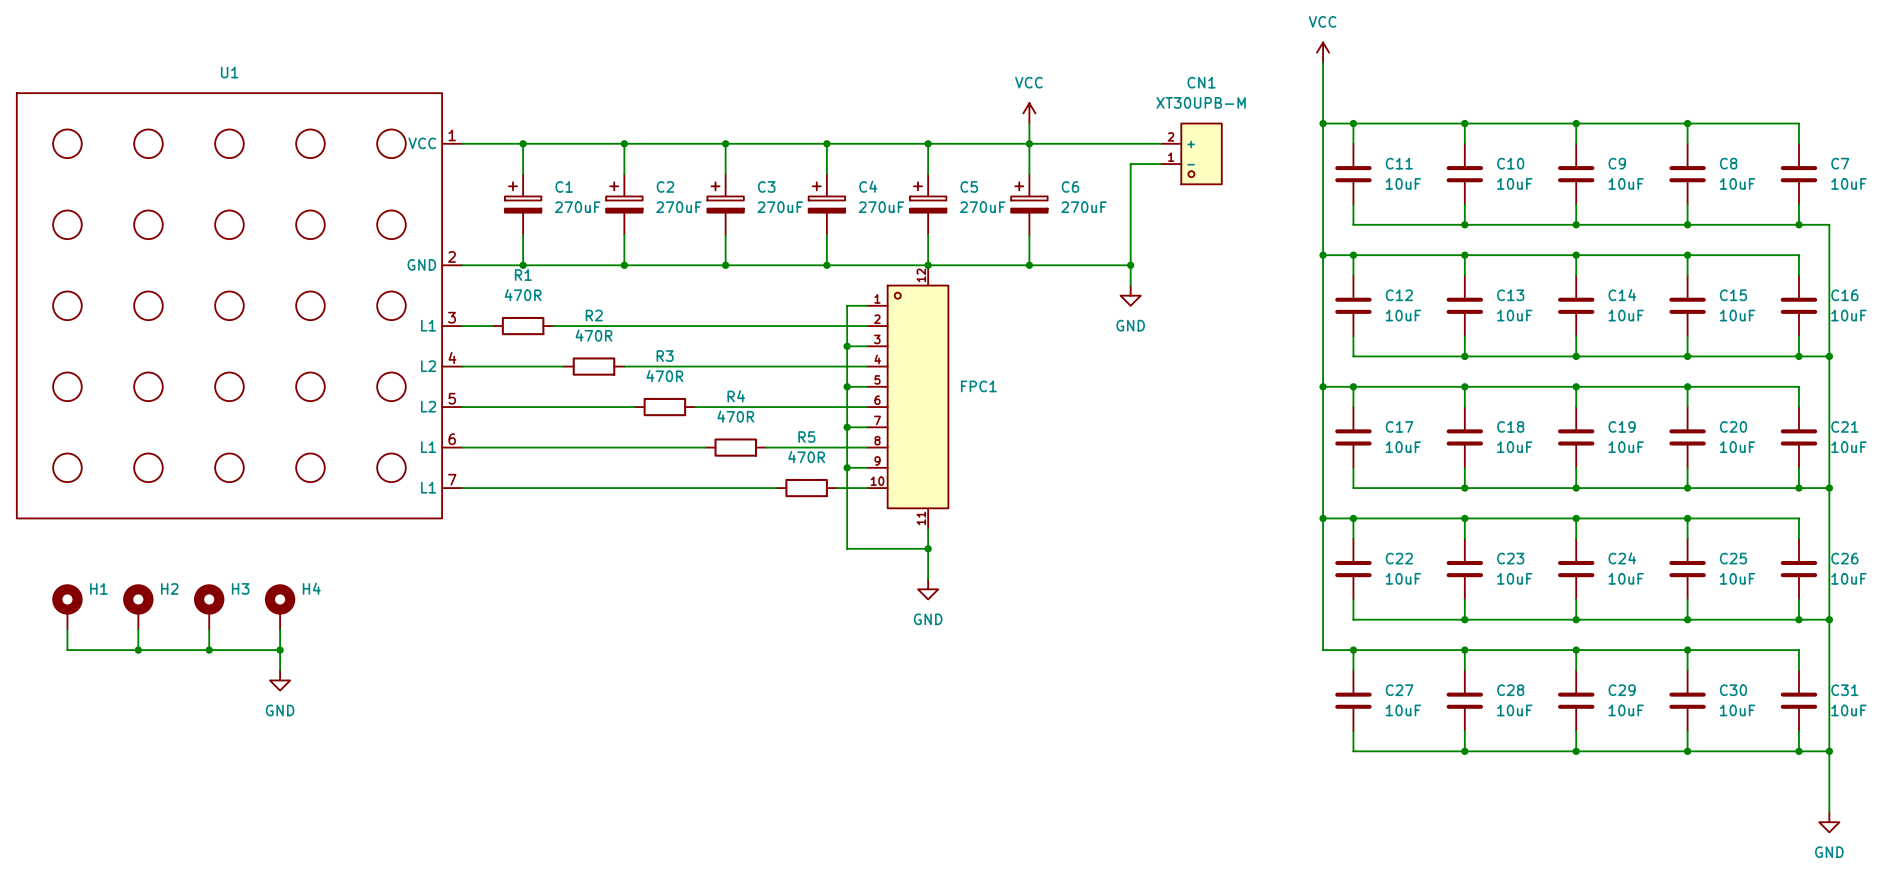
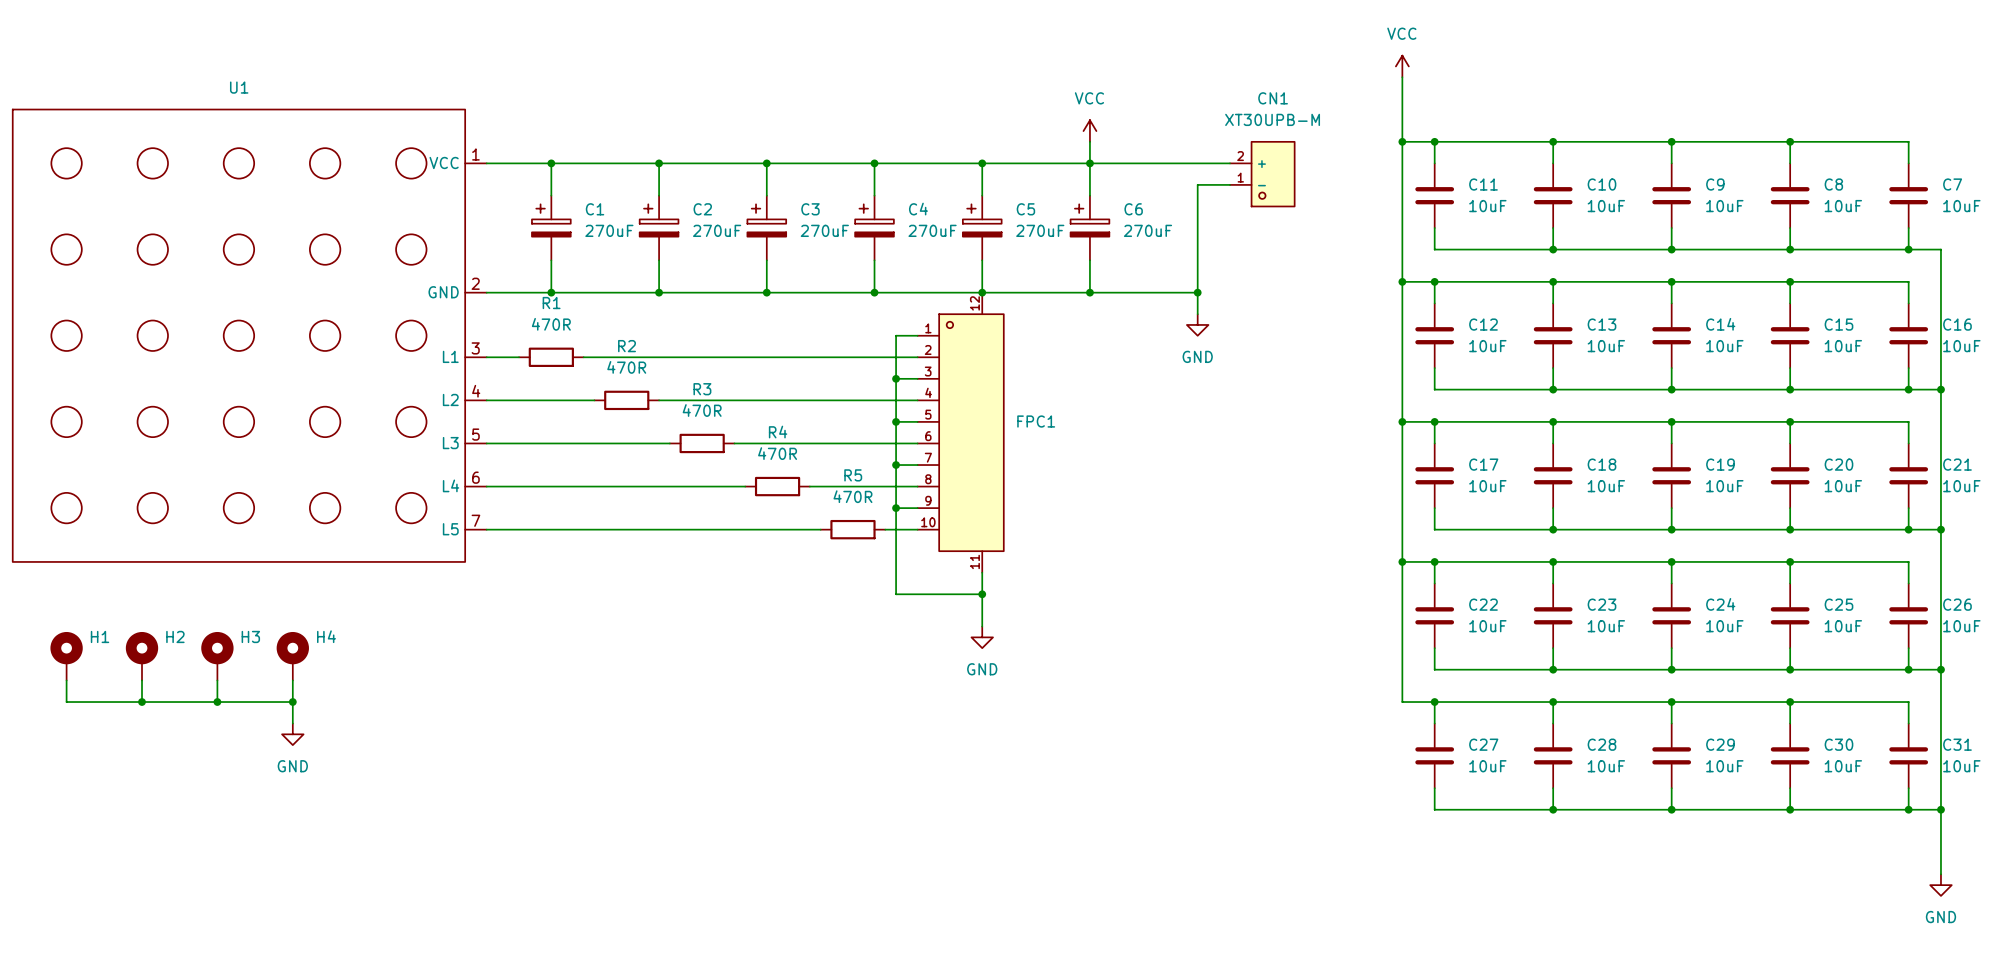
U1 pin name: L2 (428, 406) -> L3 (450, 443)
U1 pin name: L1 (428, 447) -> L4 (451, 485)
U1 pin name: L1 (428, 487) -> L5 (450, 529)

